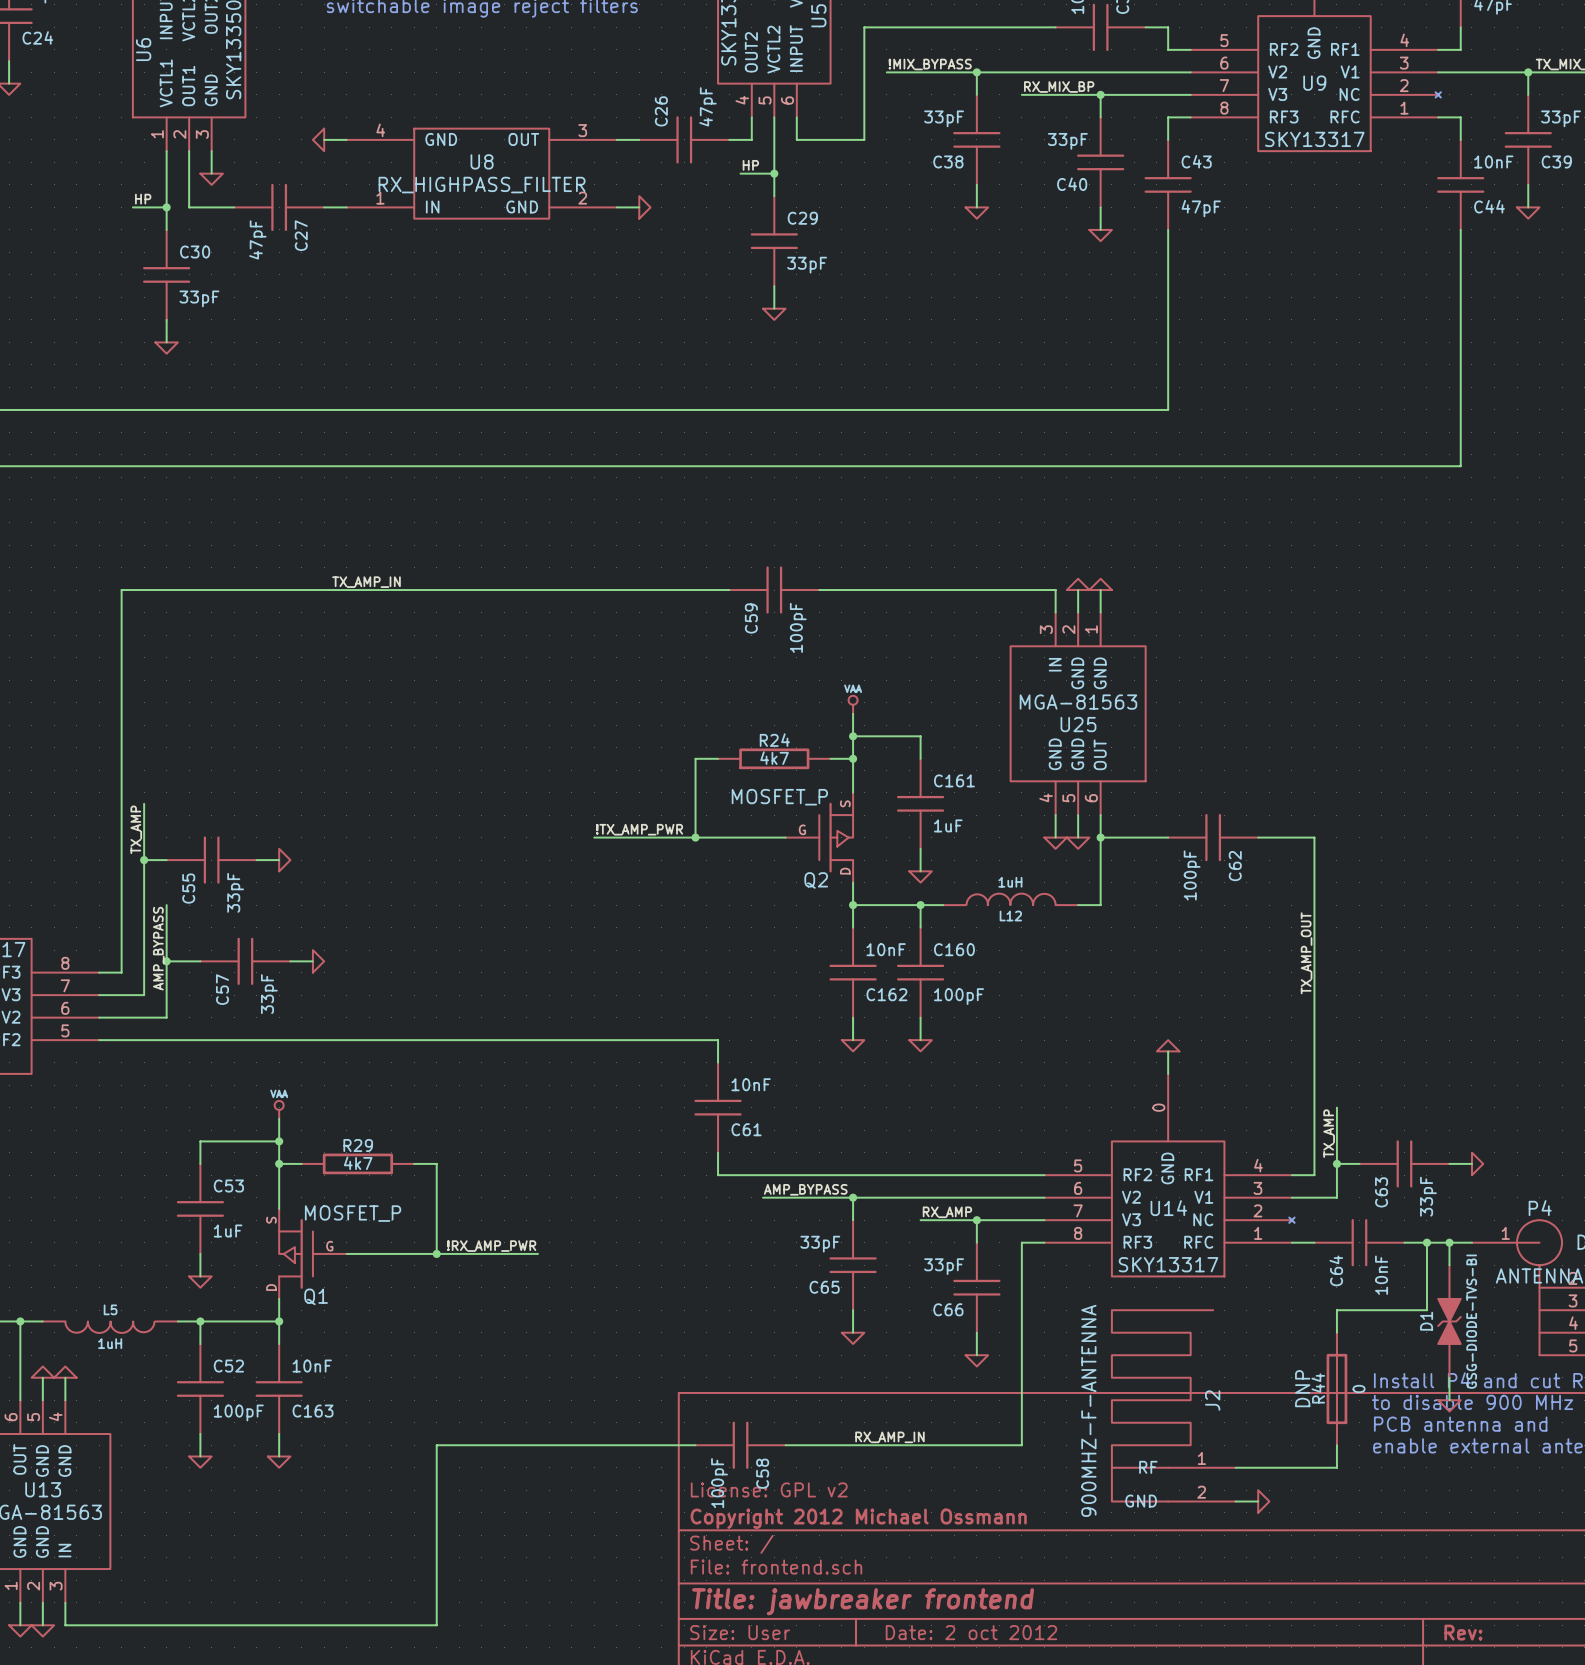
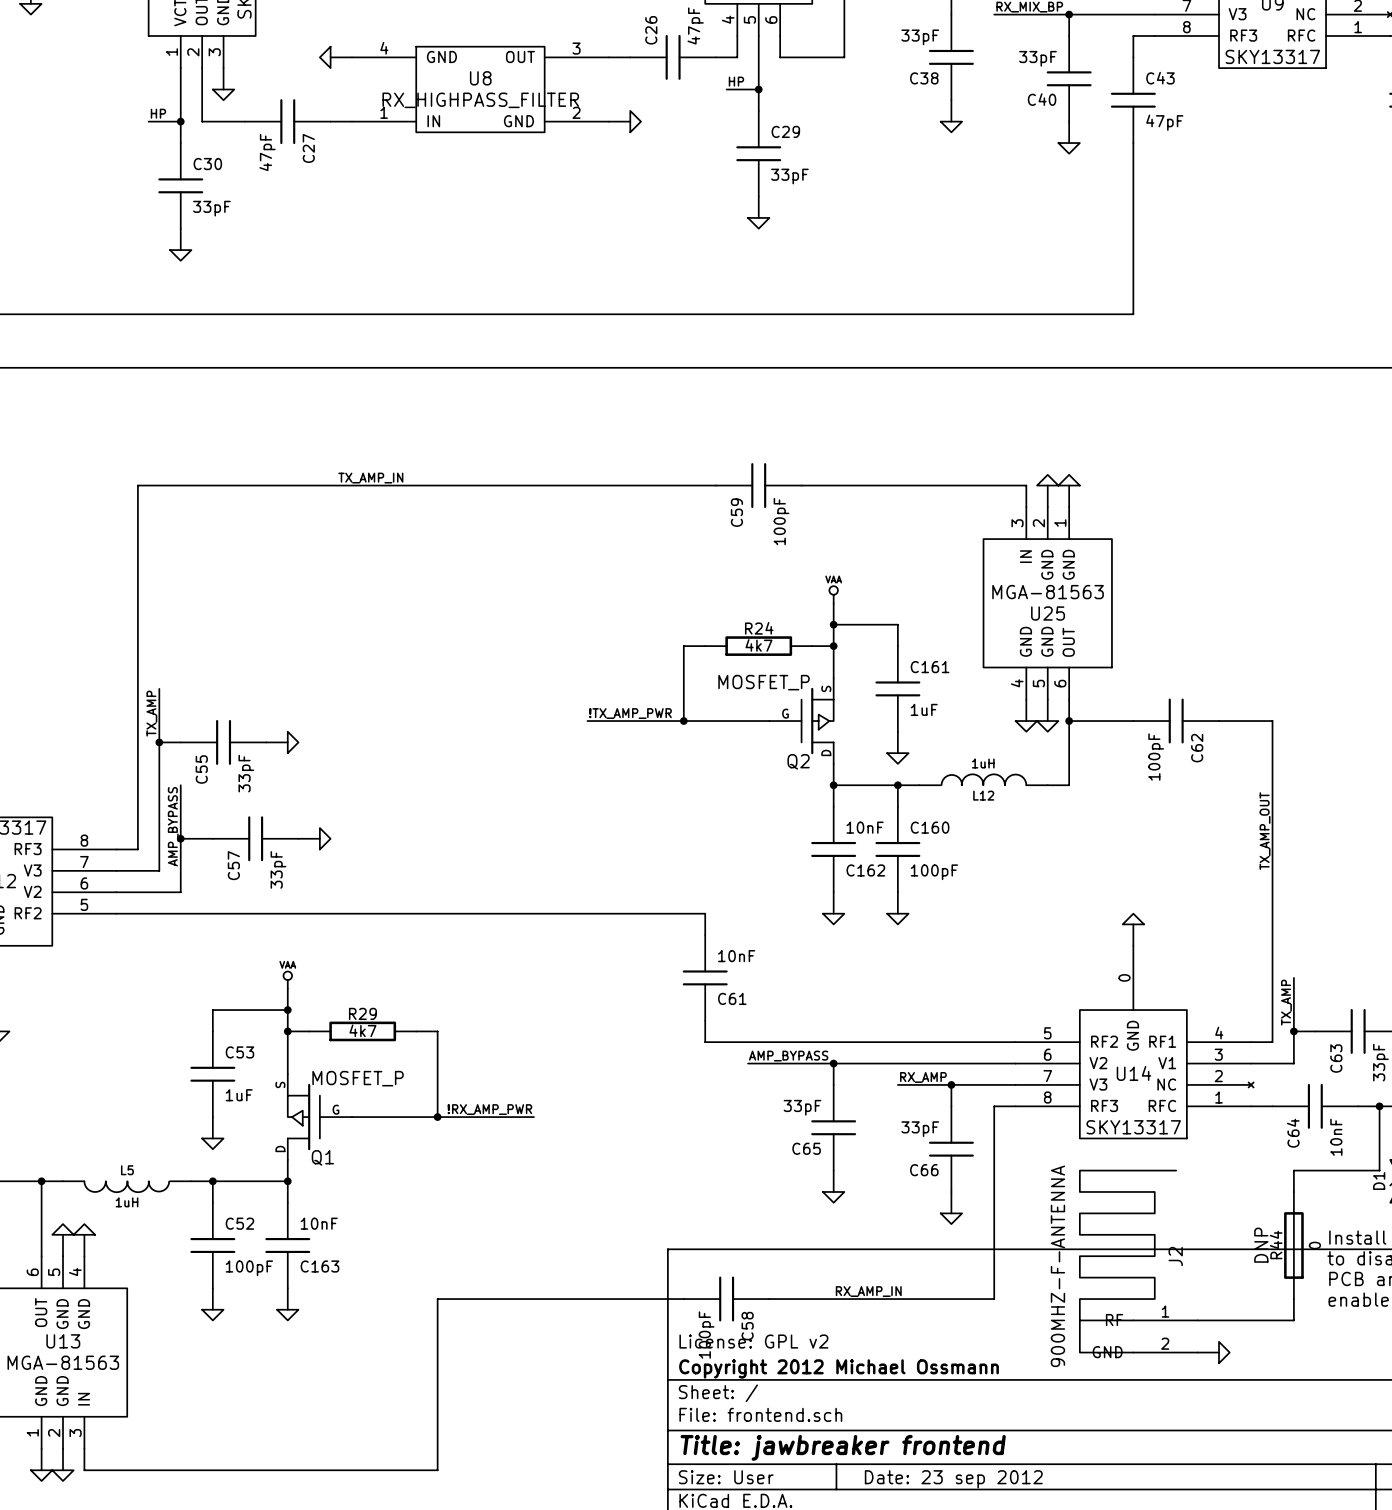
title block: Date: 2 oct 2012 (971, 1632) -> Date: 23 sep 2012 (953, 1479)

